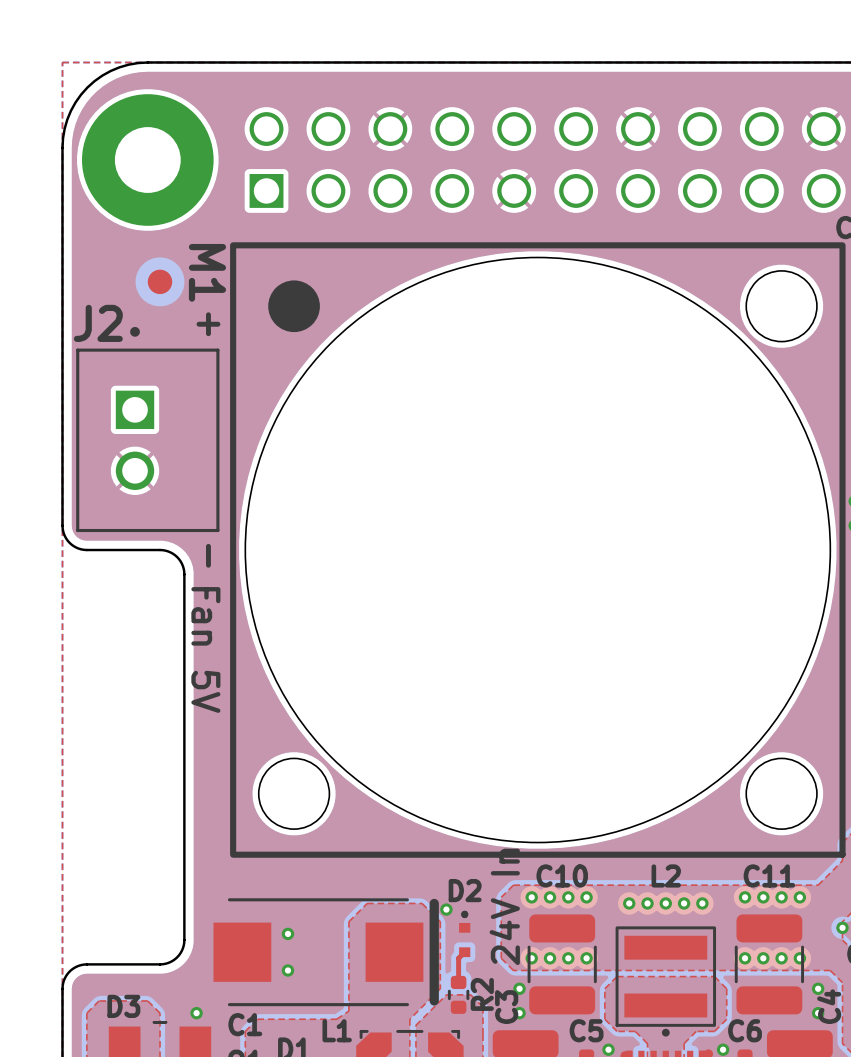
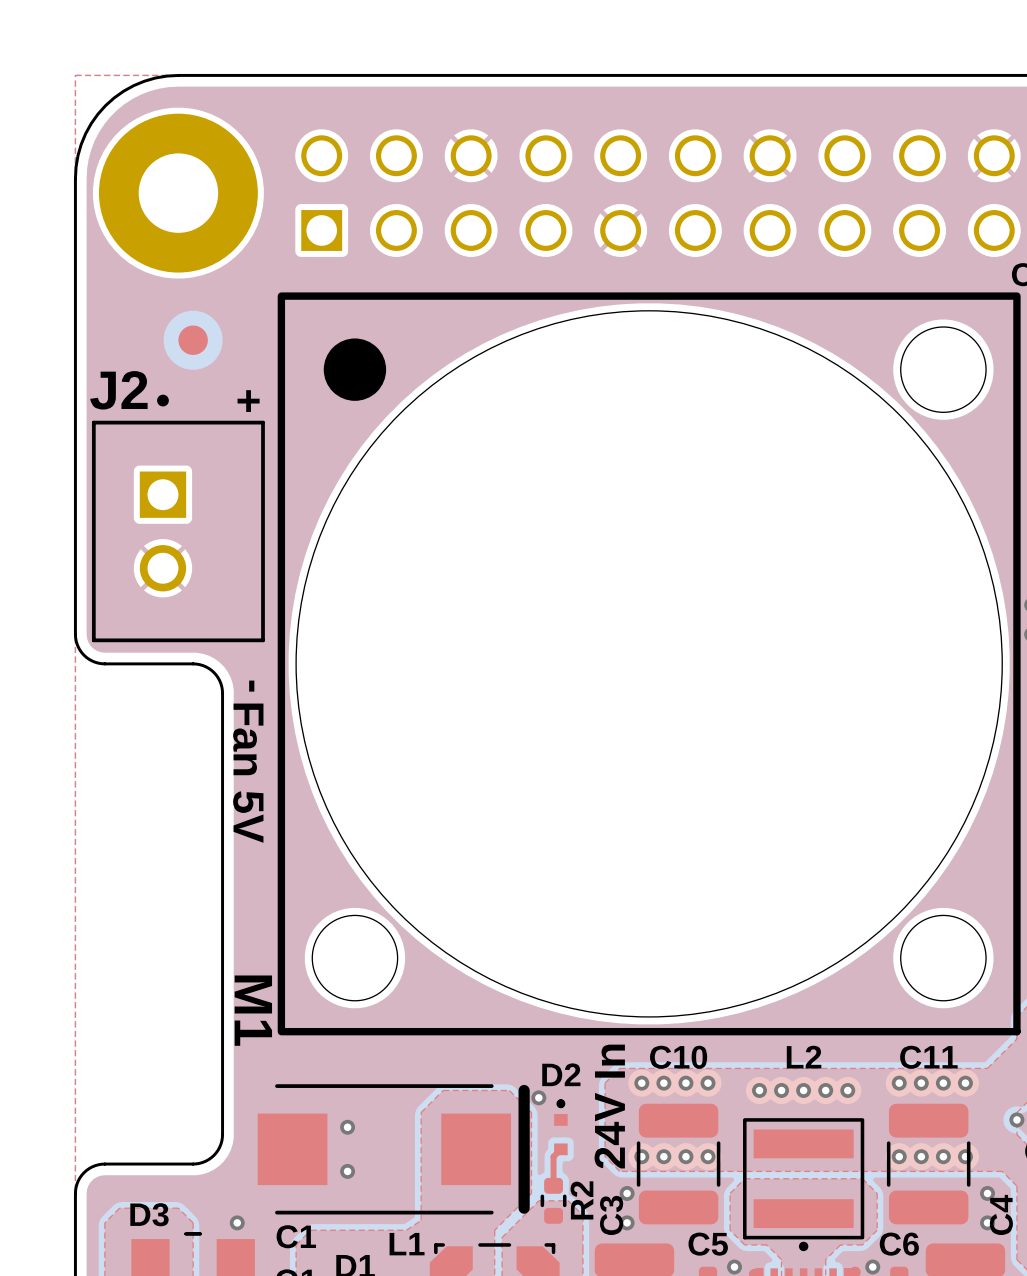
M1 name position: M1 (207, 272) -> M1 (253, 1010)

